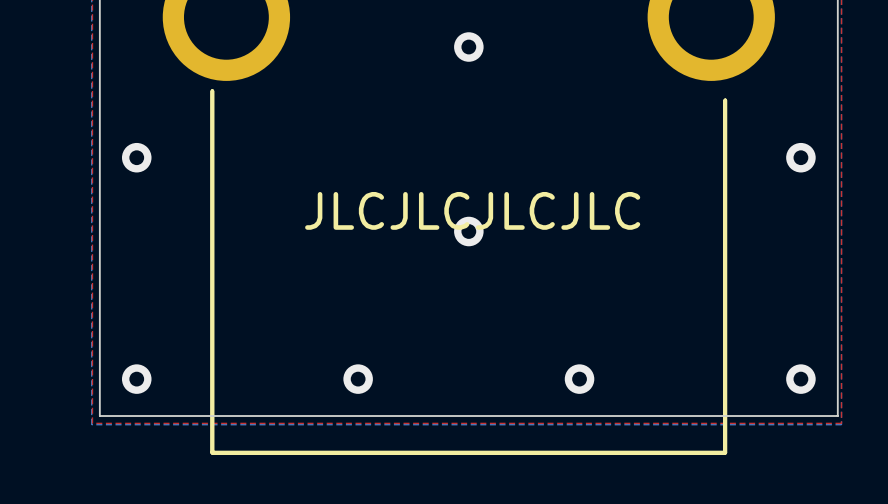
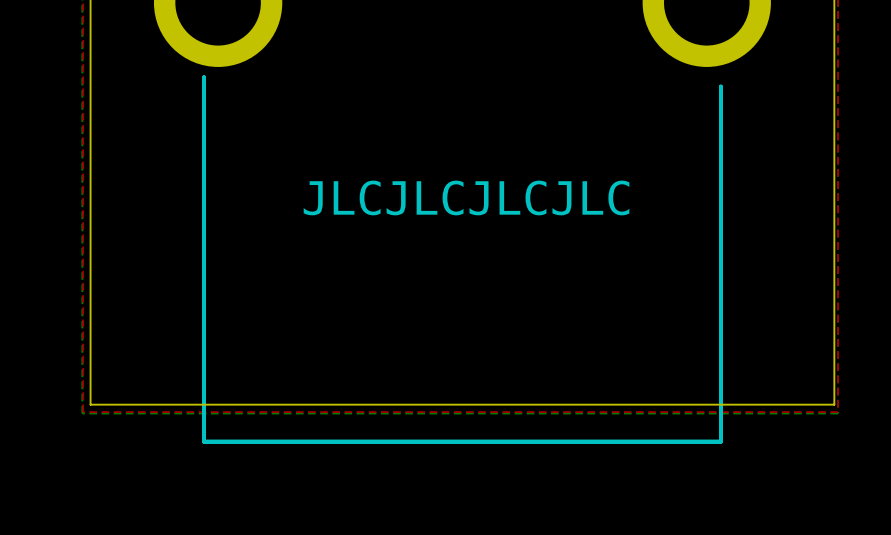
via: (468, 47) -> none
via: (136, 157) -> none
via: (800, 157) -> none
via: (468, 231) -> none
via: (136, 379) -> none
via: (358, 379) -> none
via: (579, 379) -> none
via: (800, 379) -> none

